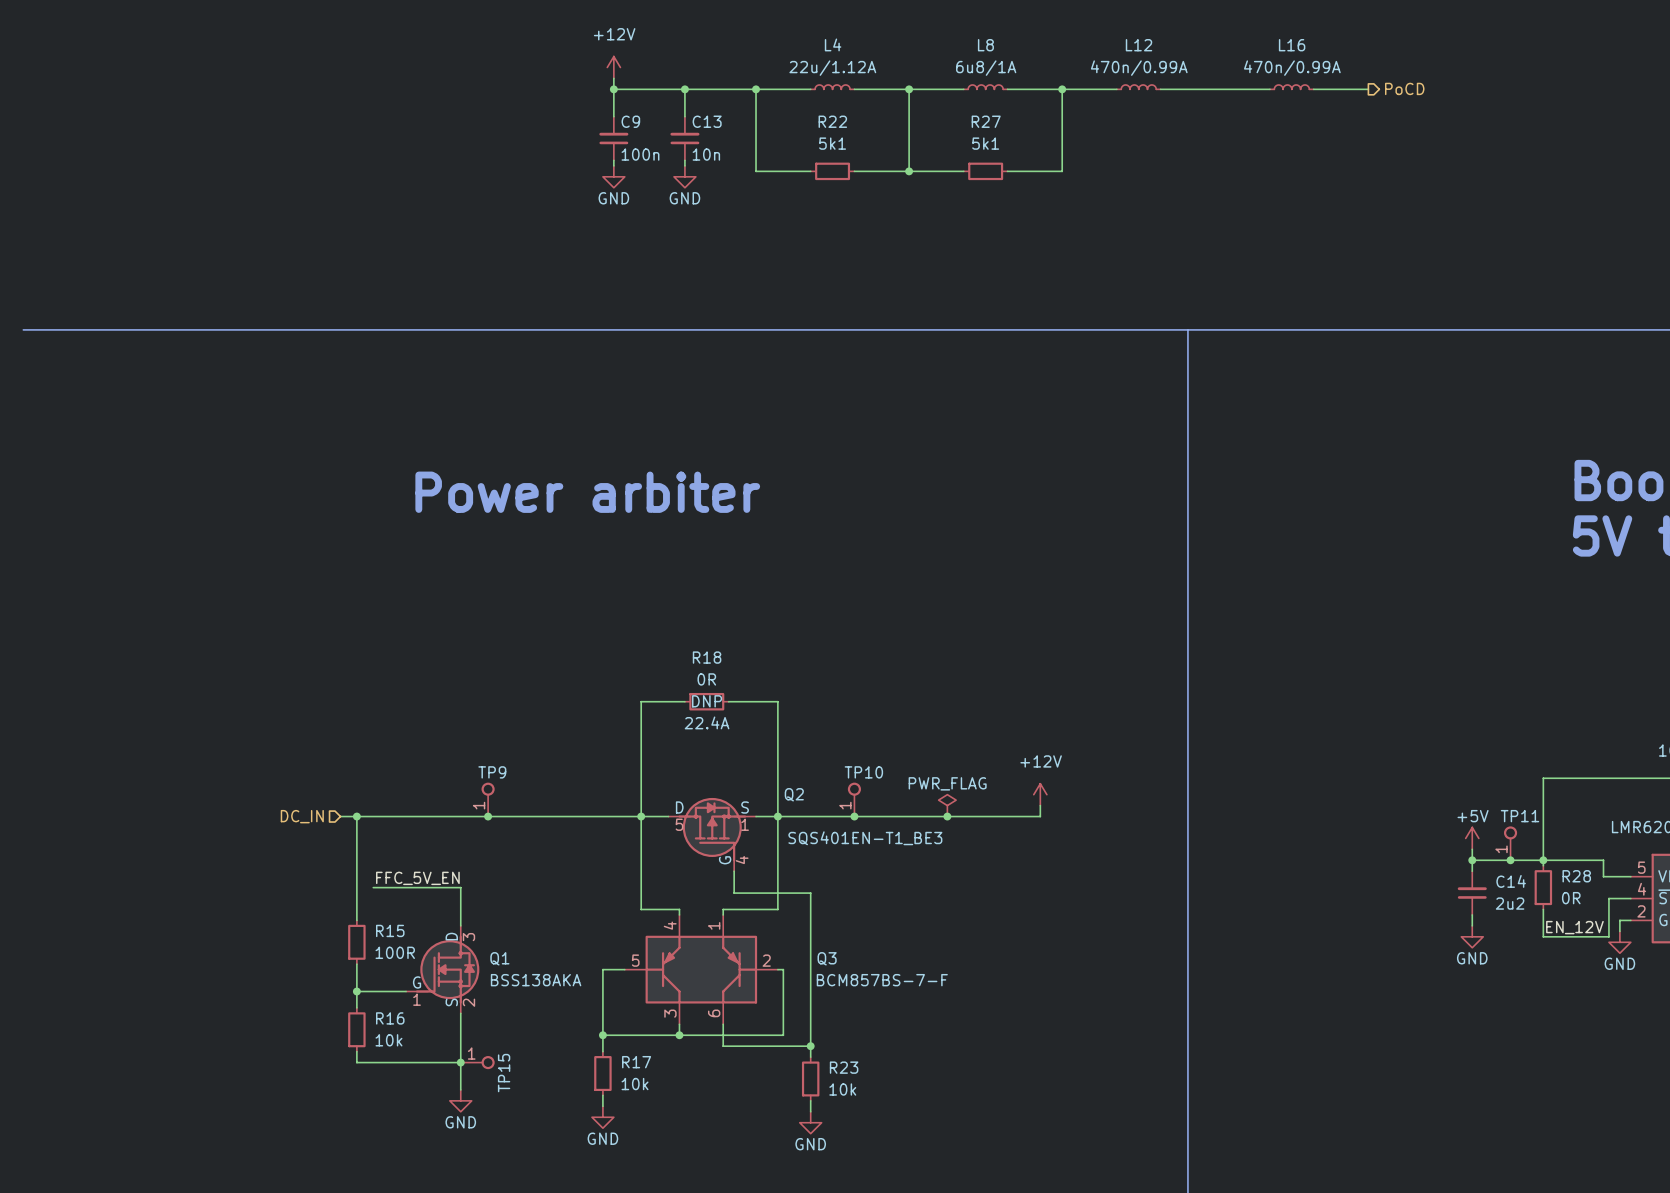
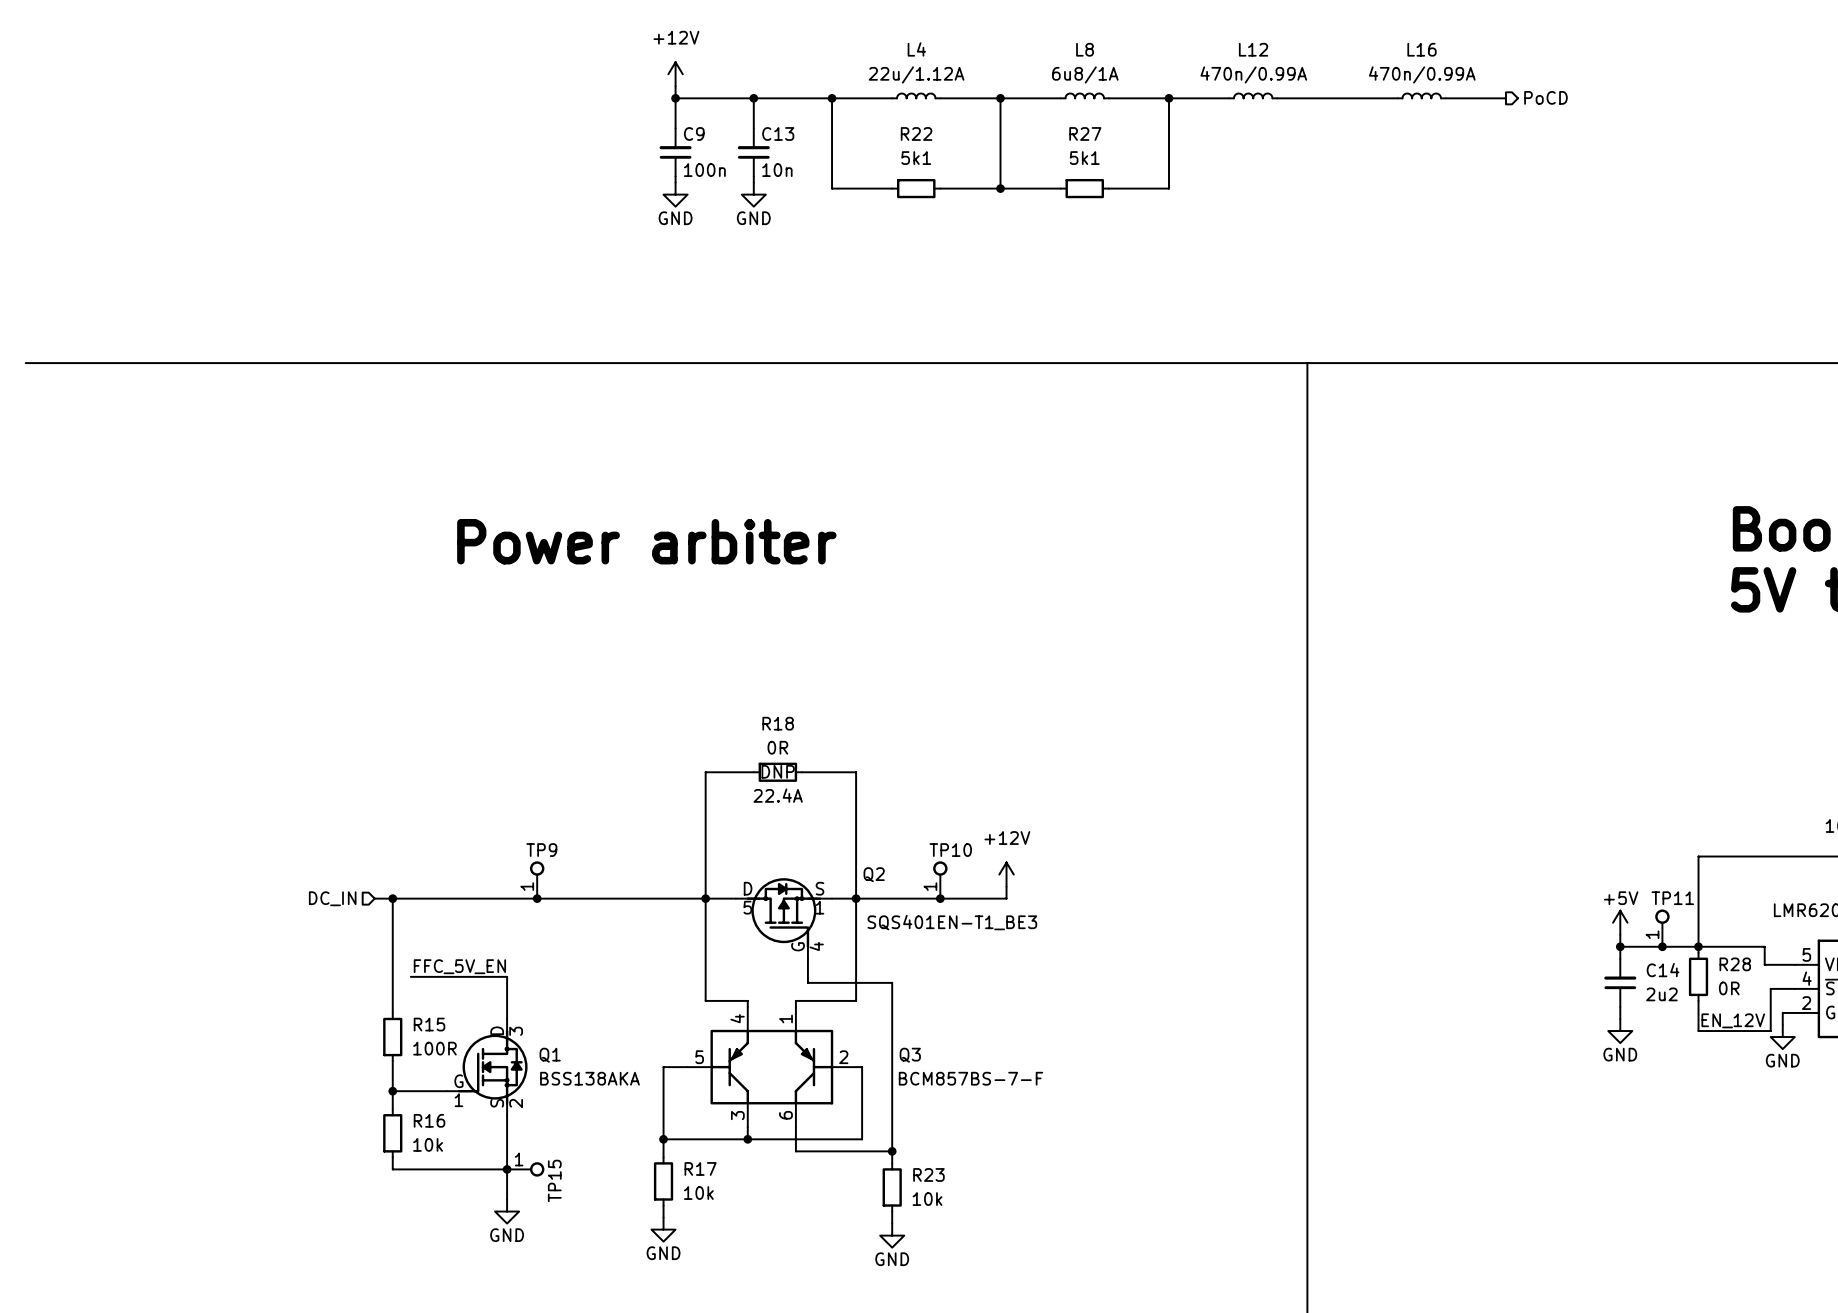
power symbol position: +12V (1040, 794) -> +12V (1006, 874)
power symbol: PWR_FLAG (947, 805) -> none
wire: (1040, 805) (1040, 816) (914, 816) -> (1006, 886) (1006, 898)
junction: (947, 816) -> none

